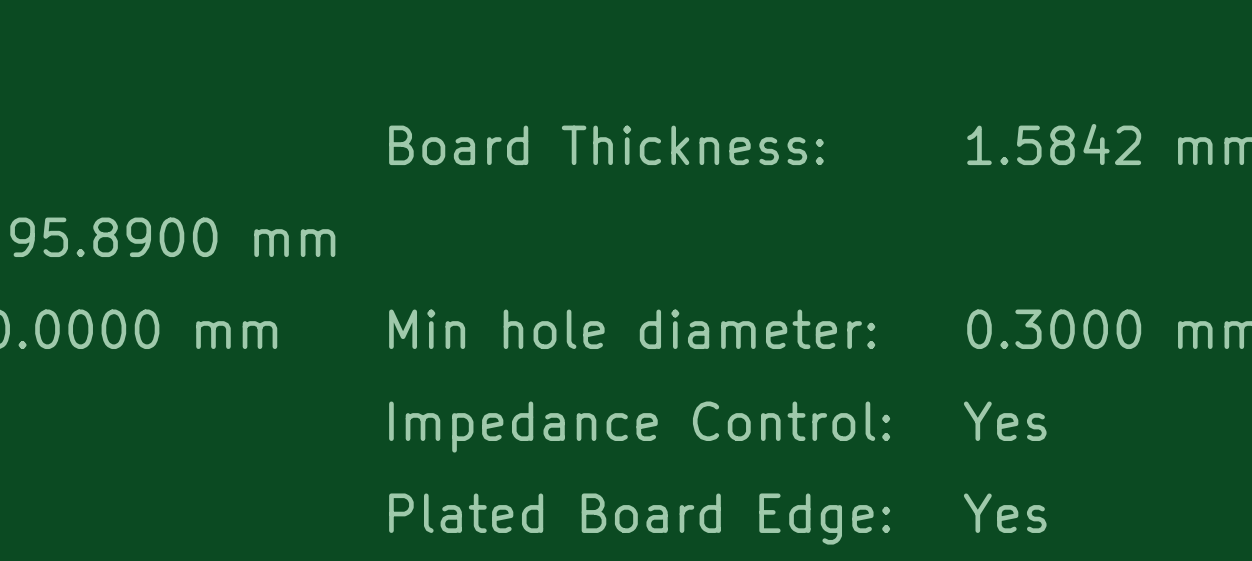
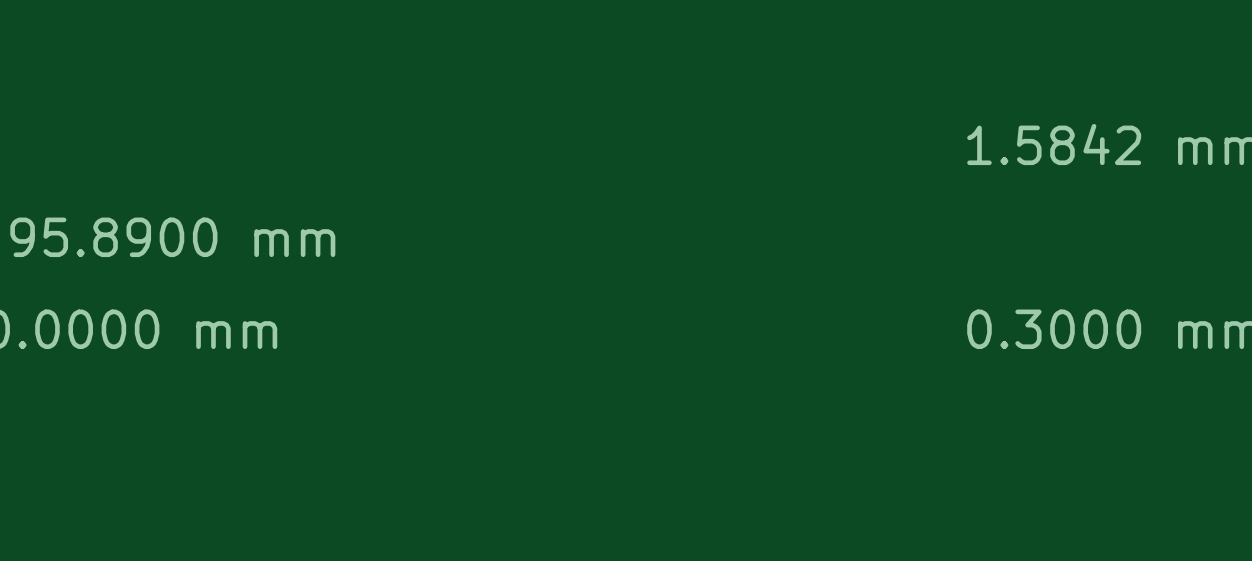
text: Board Thickness: (606, 145) -> none
text: Min hole diameter: (632, 329) -> none
text: Yes (1005, 421) -> none
text: Impedance Control: (639, 427) -> none
text: Yes (1005, 513) -> none
text: Plated Board Edge: (639, 519) -> none

